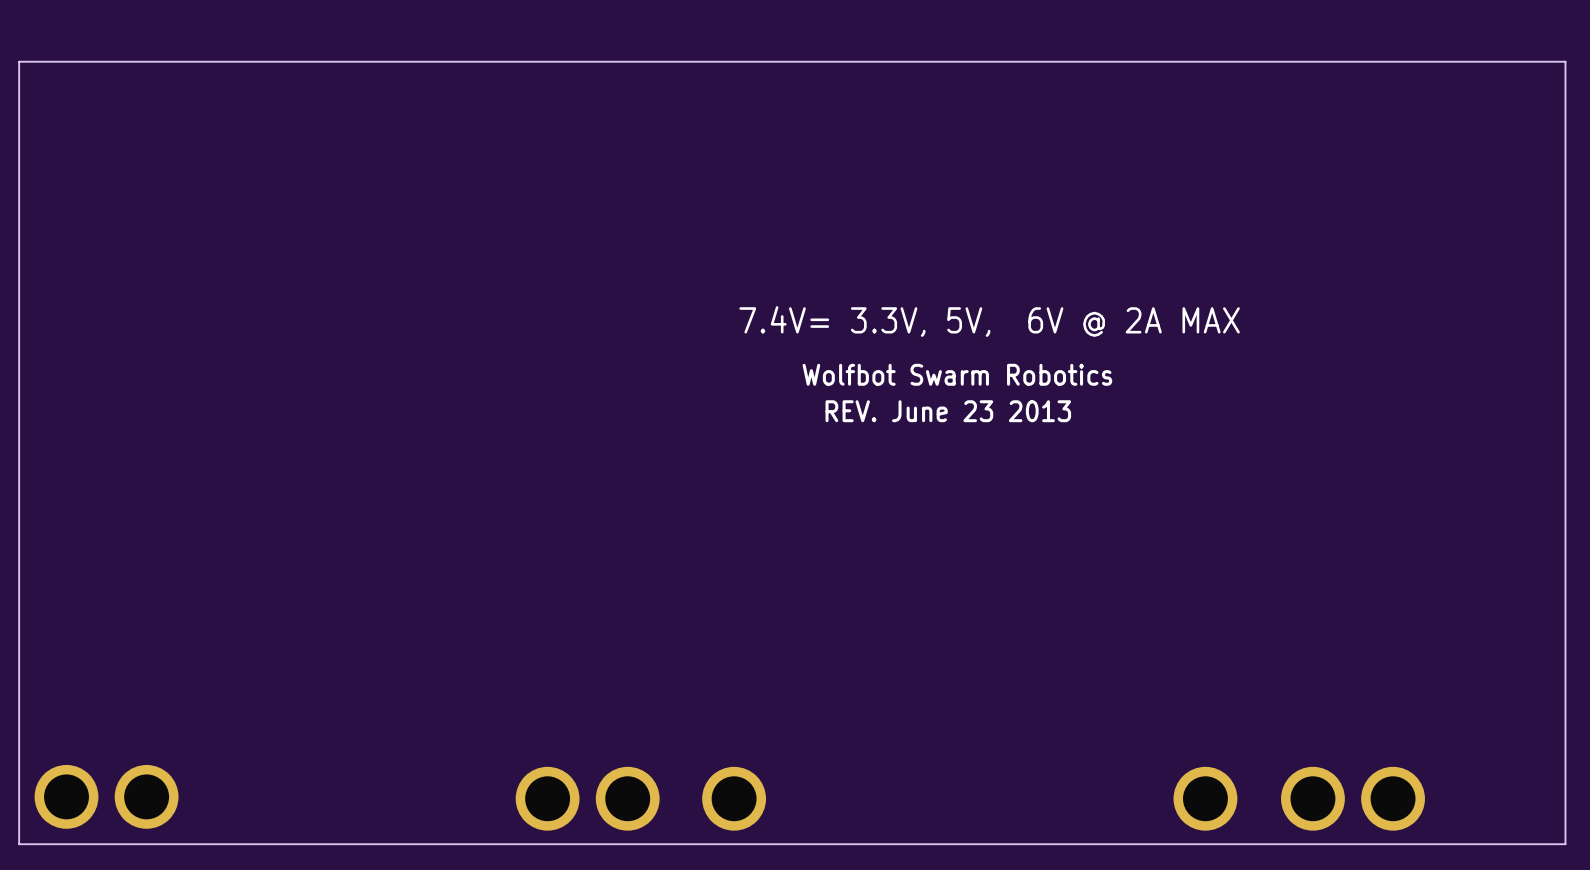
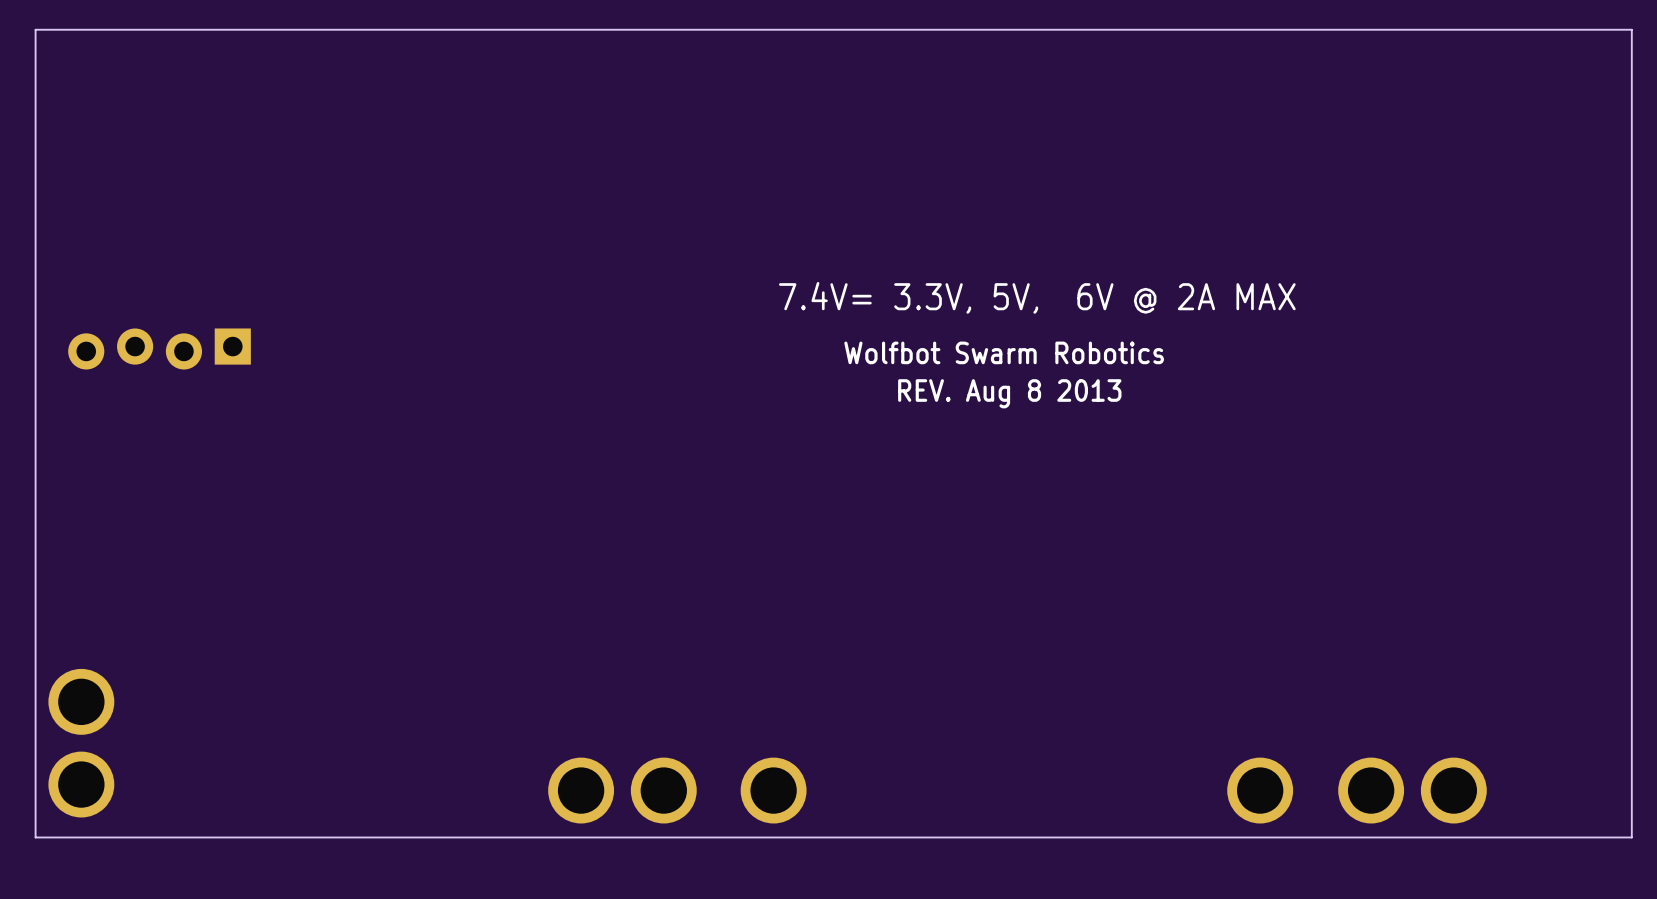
part: none -> (159, 348)
text: REV. June 23 2013 (948, 411) -> REV. Aug 8 2013 (1009, 393)
part rotation: 0° (106, 796) -> 90° clockwise (81, 743)

